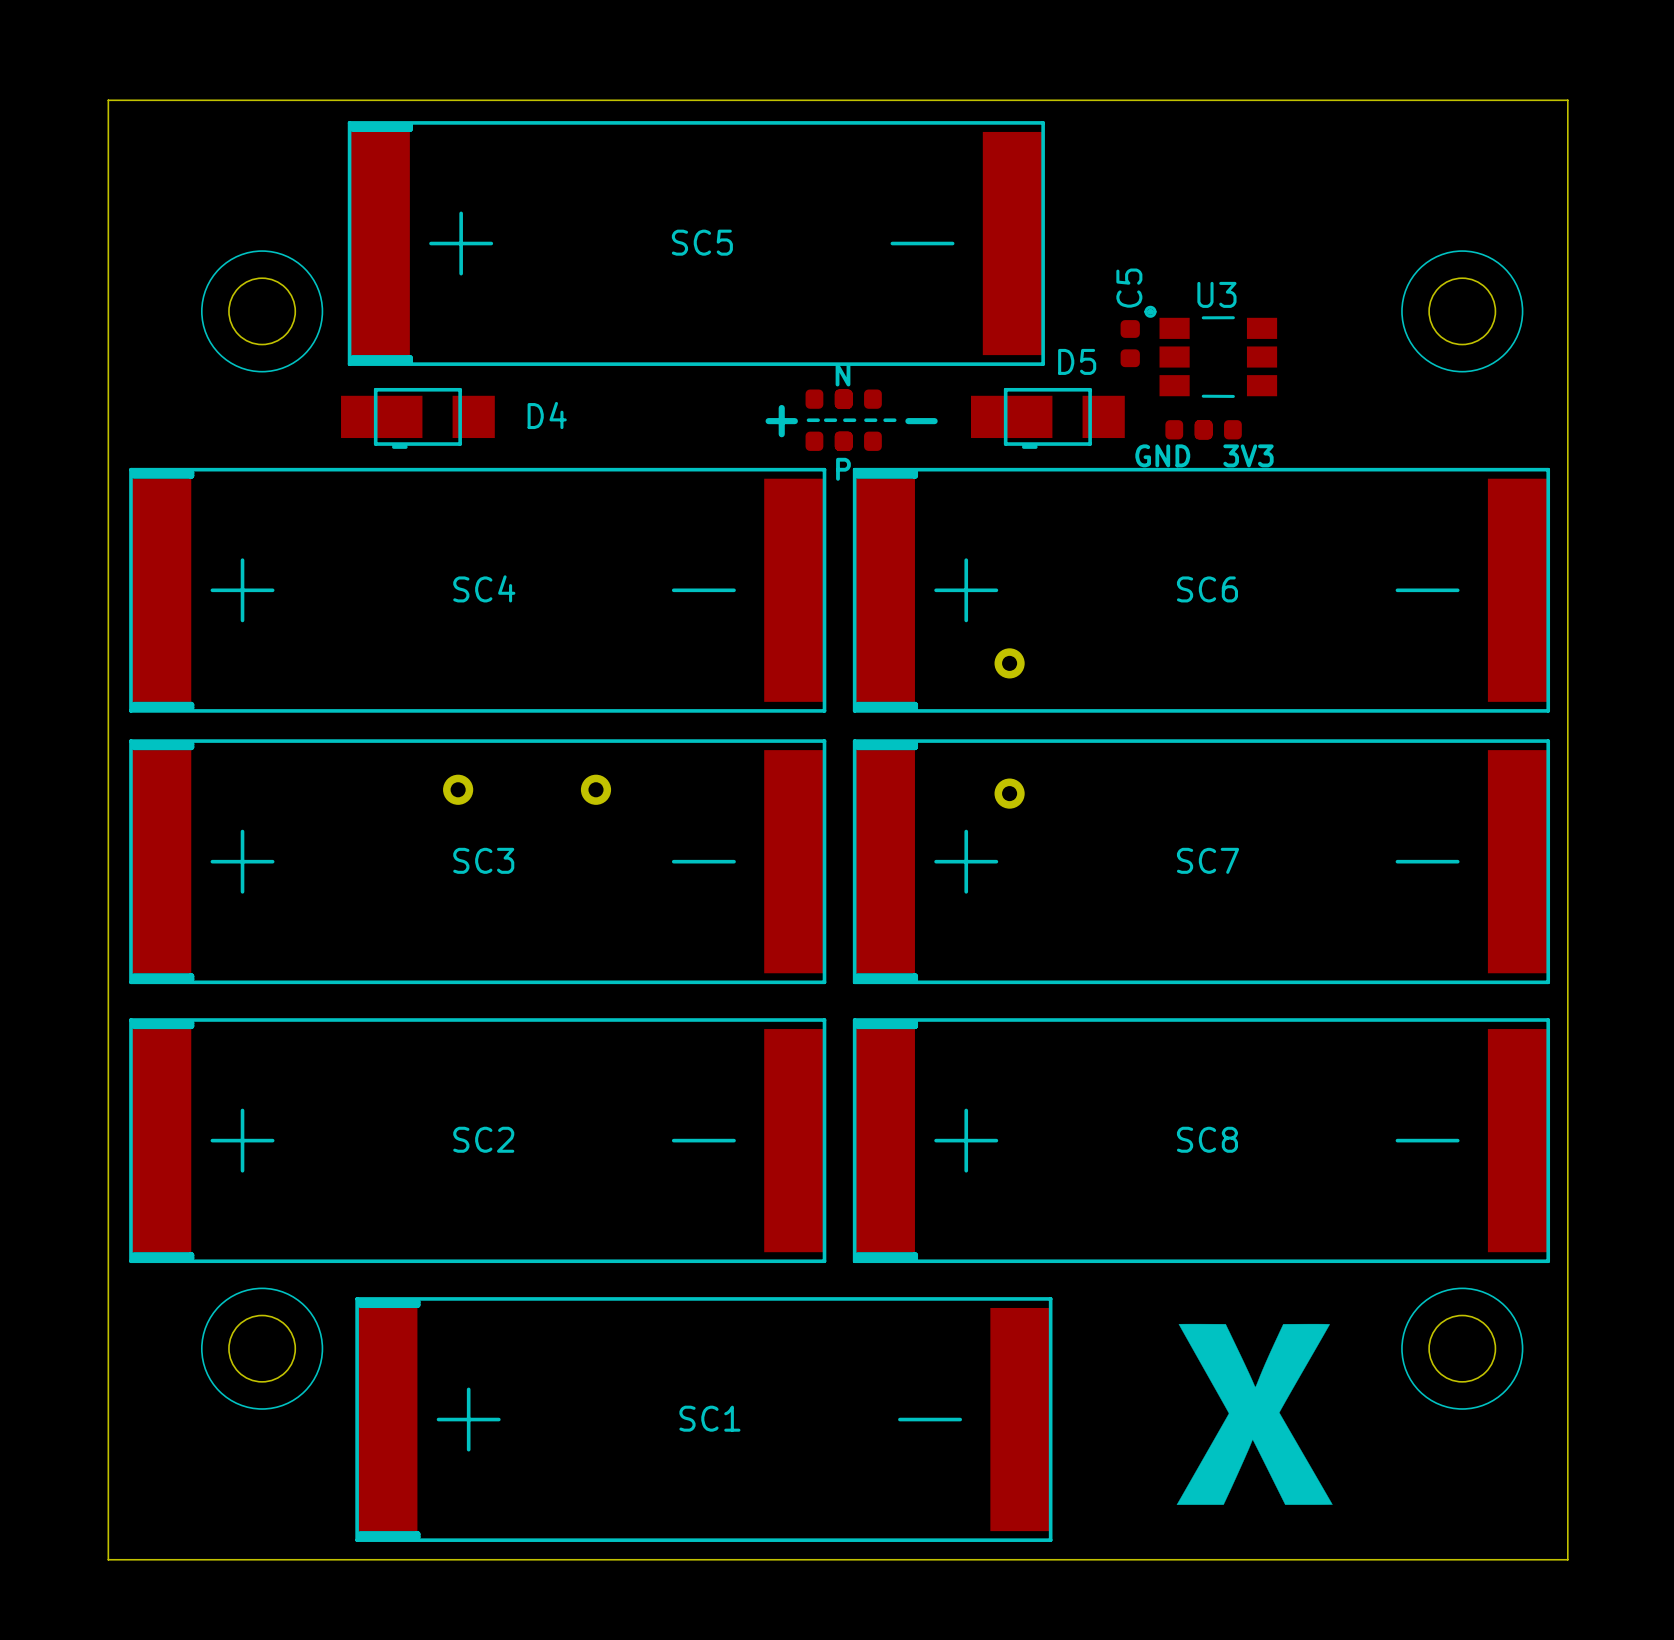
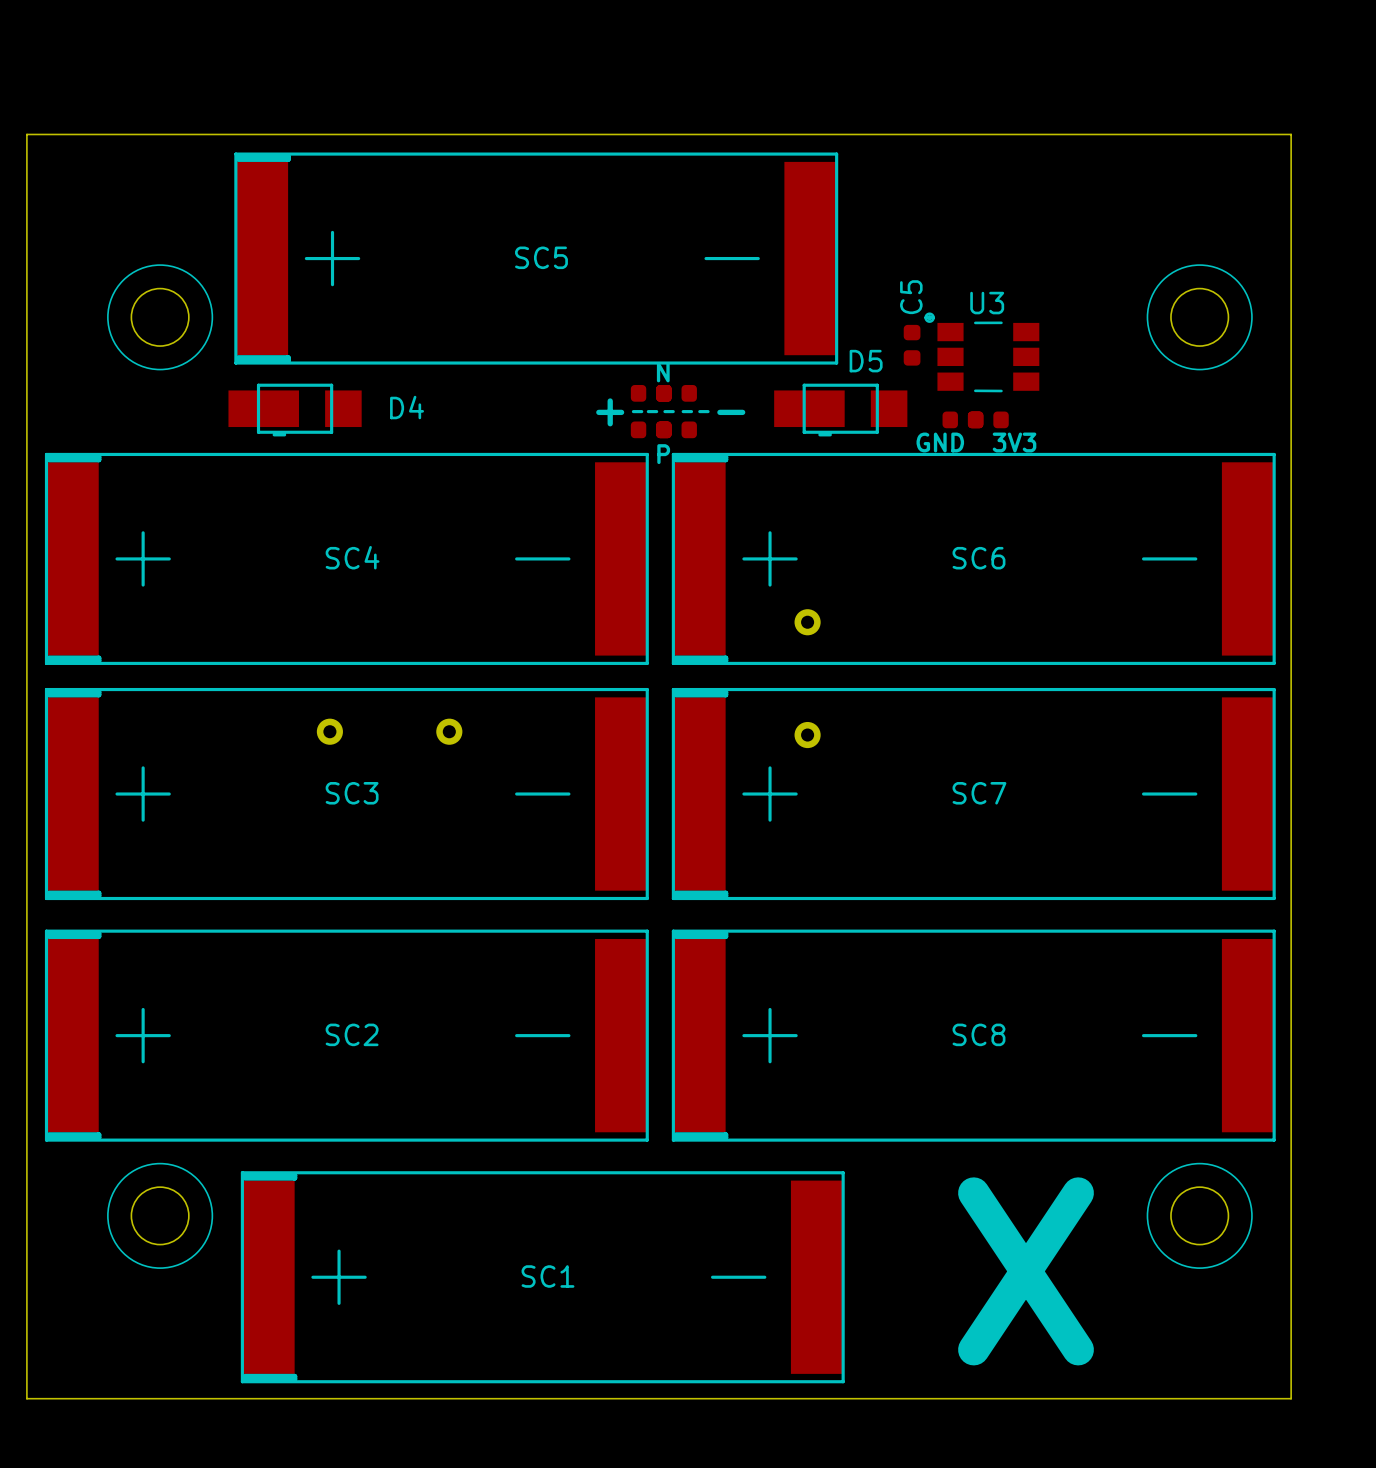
drawing: [1176, 1323, 1333, 1505] -> none
text: none -> X (1026, 1271)

